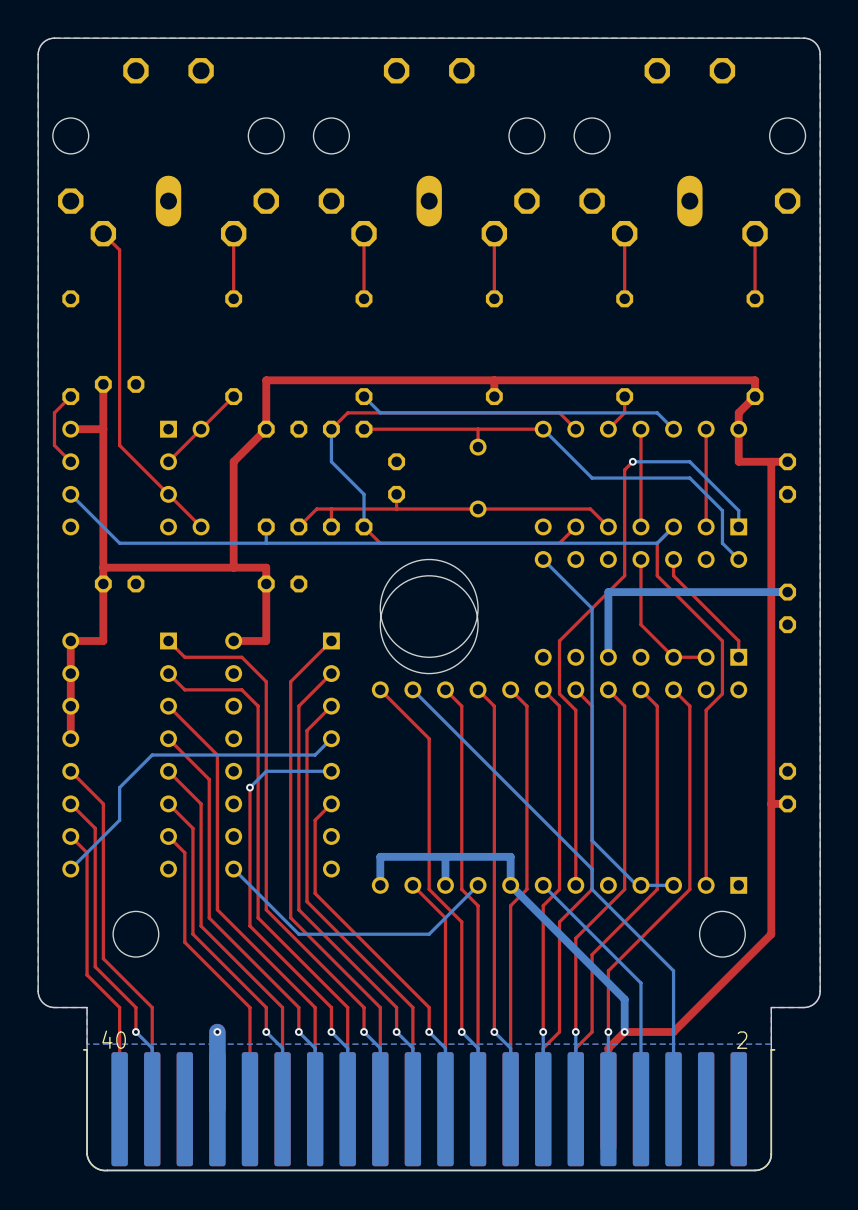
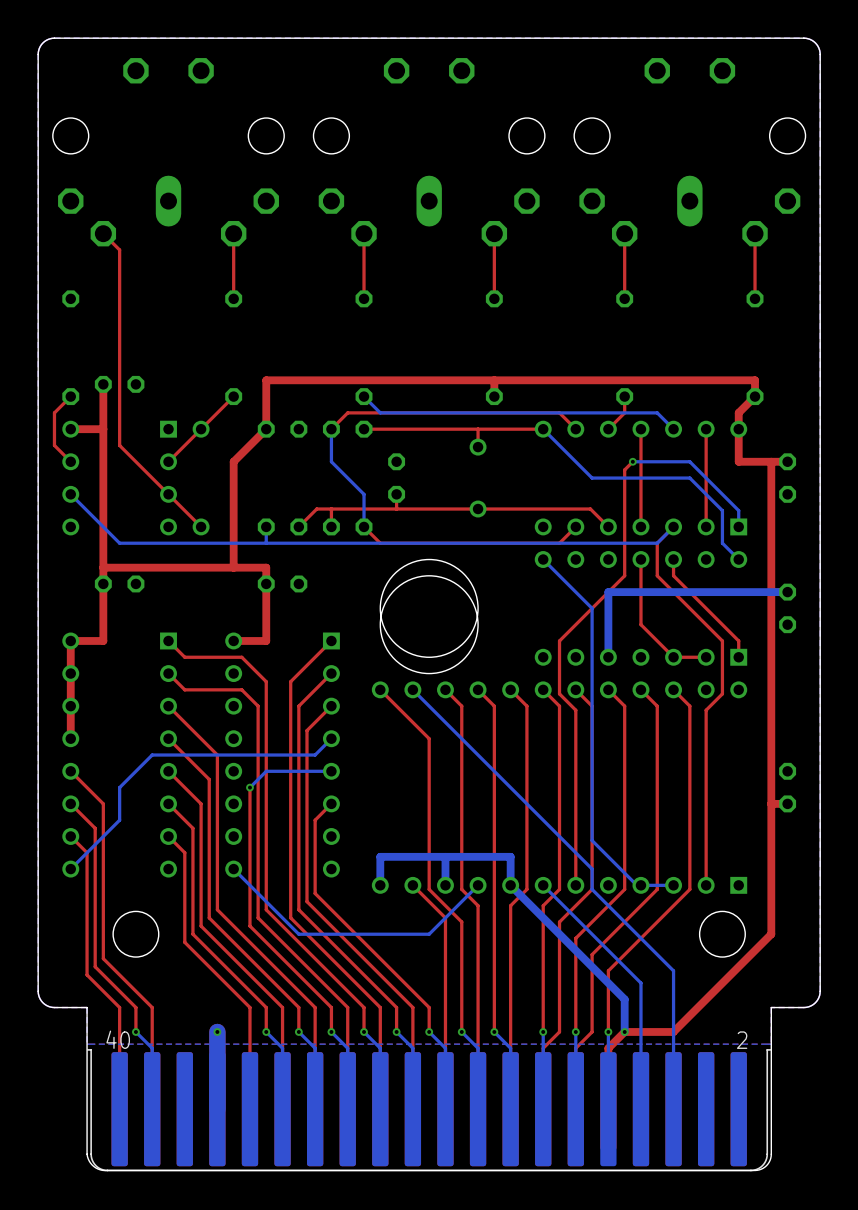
part footprint: [82, 1049, 776, 1172] -> [87, 1049, 772, 1172]

